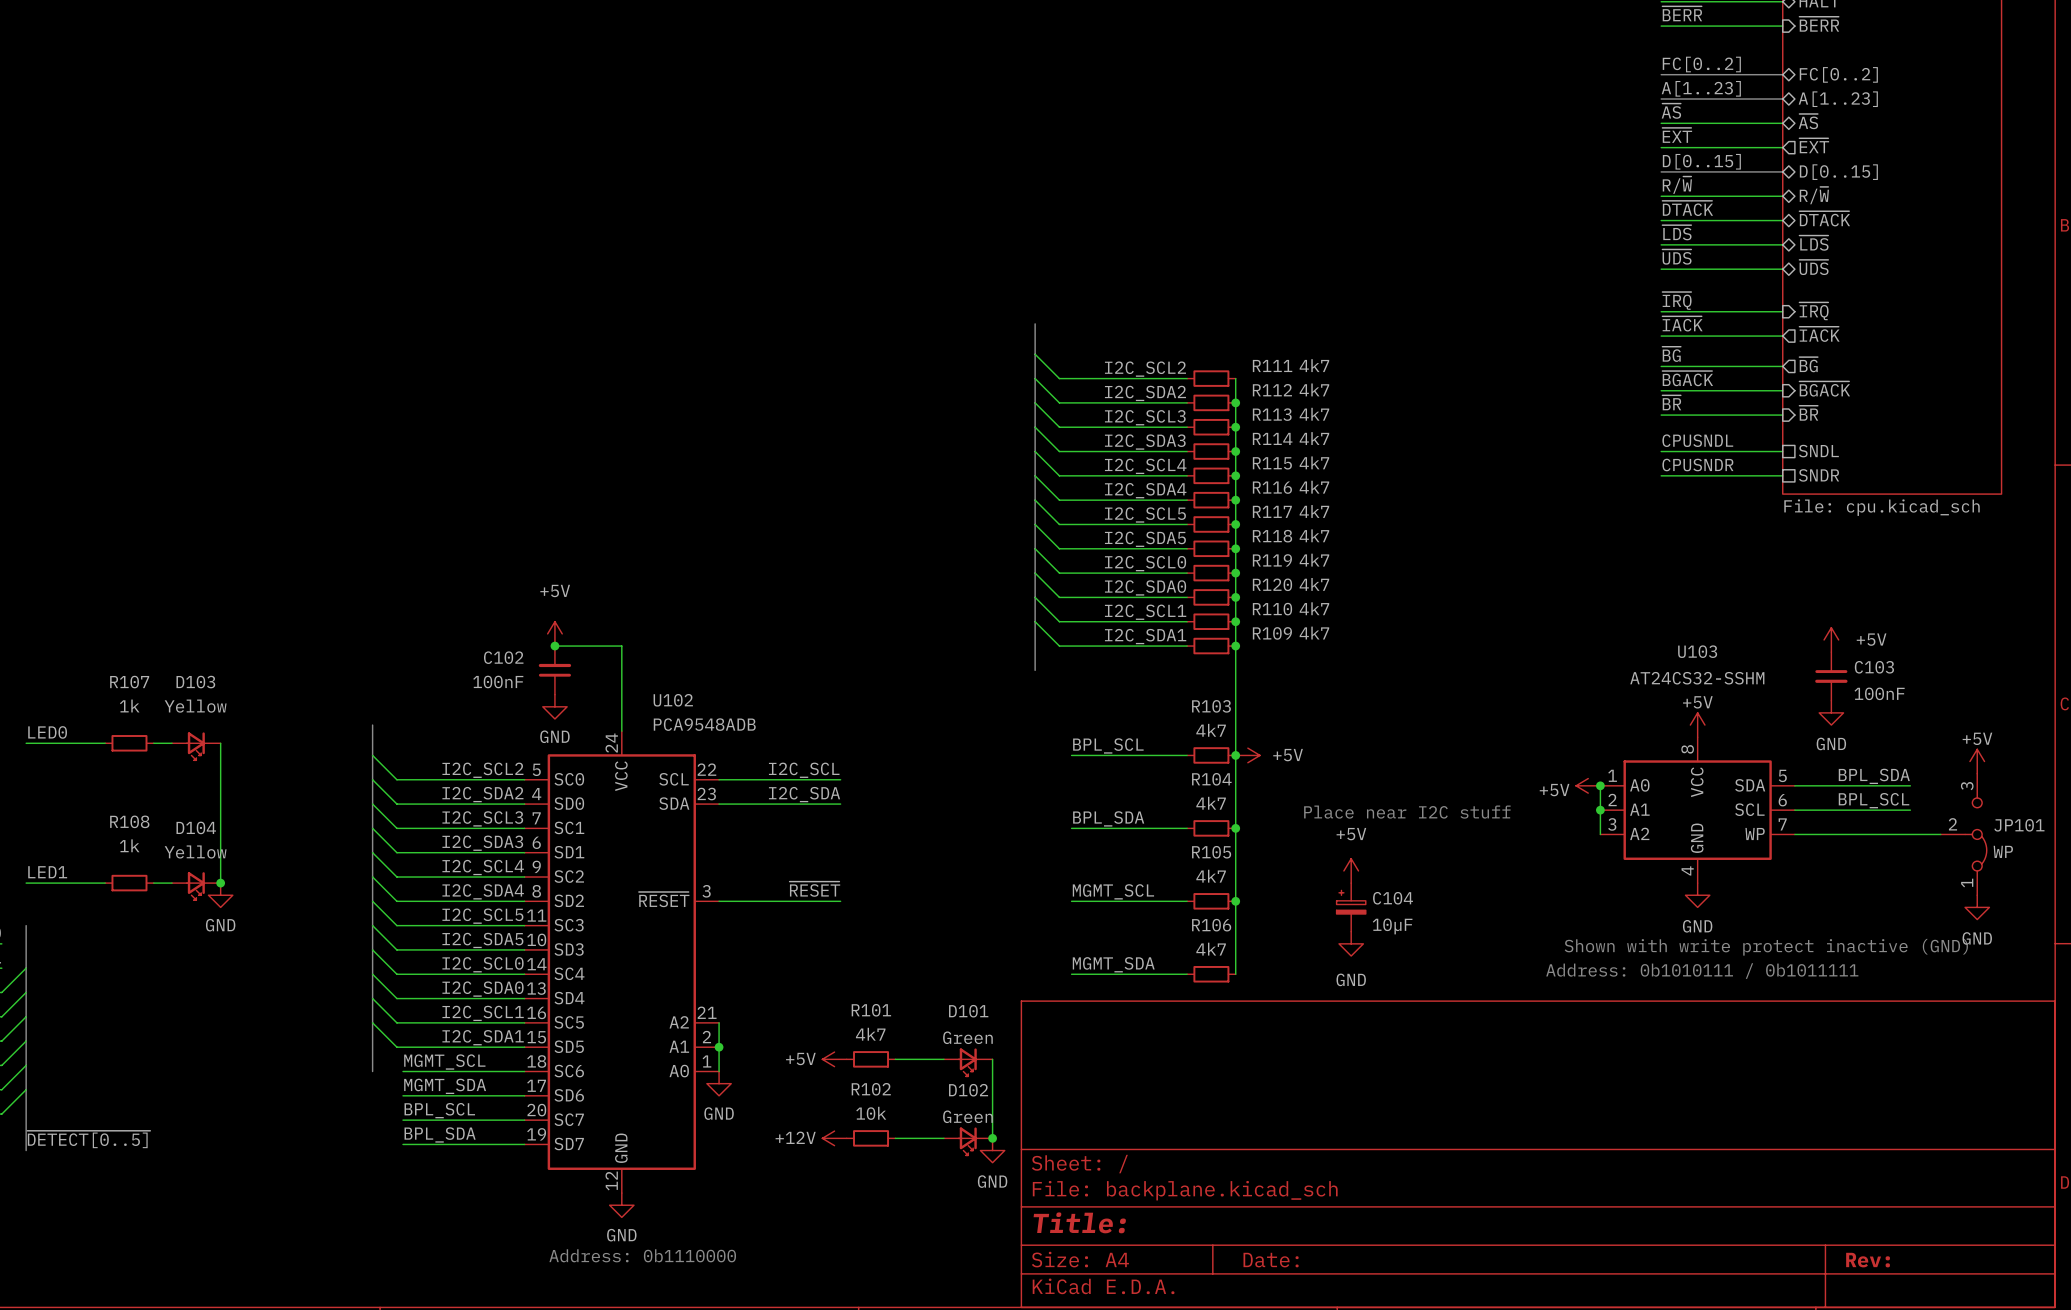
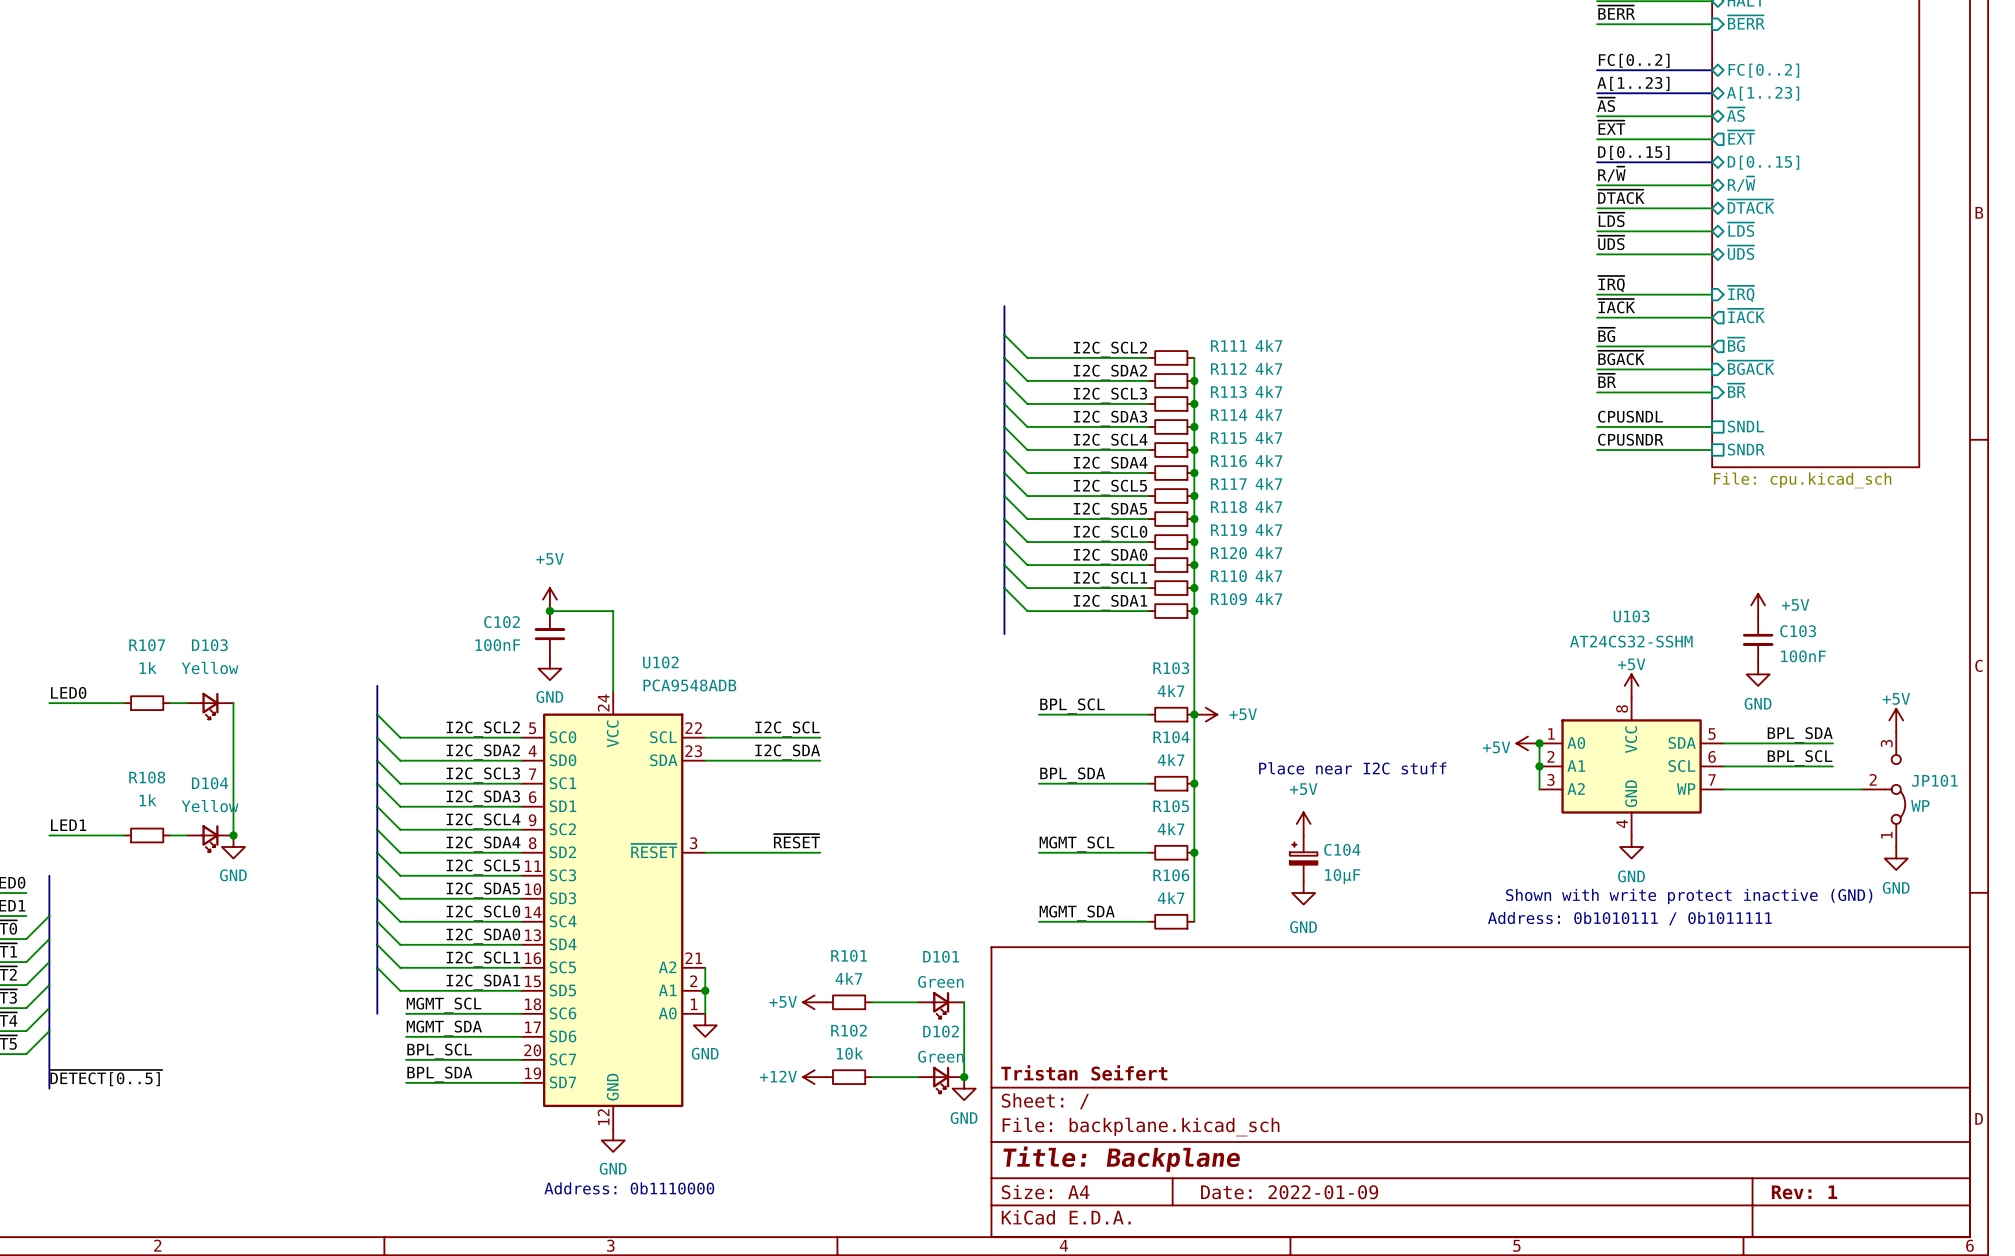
title block: none -> Tristan Seifert (1084, 1072)
title block: Title: (1079, 1222) -> Title: Backplane (1121, 1159)
title block: Date: (1271, 1260) -> Date: 2022-01-09 (1289, 1192)
title block: Rev: (1868, 1260) -> Rev: 1 (1804, 1192)

